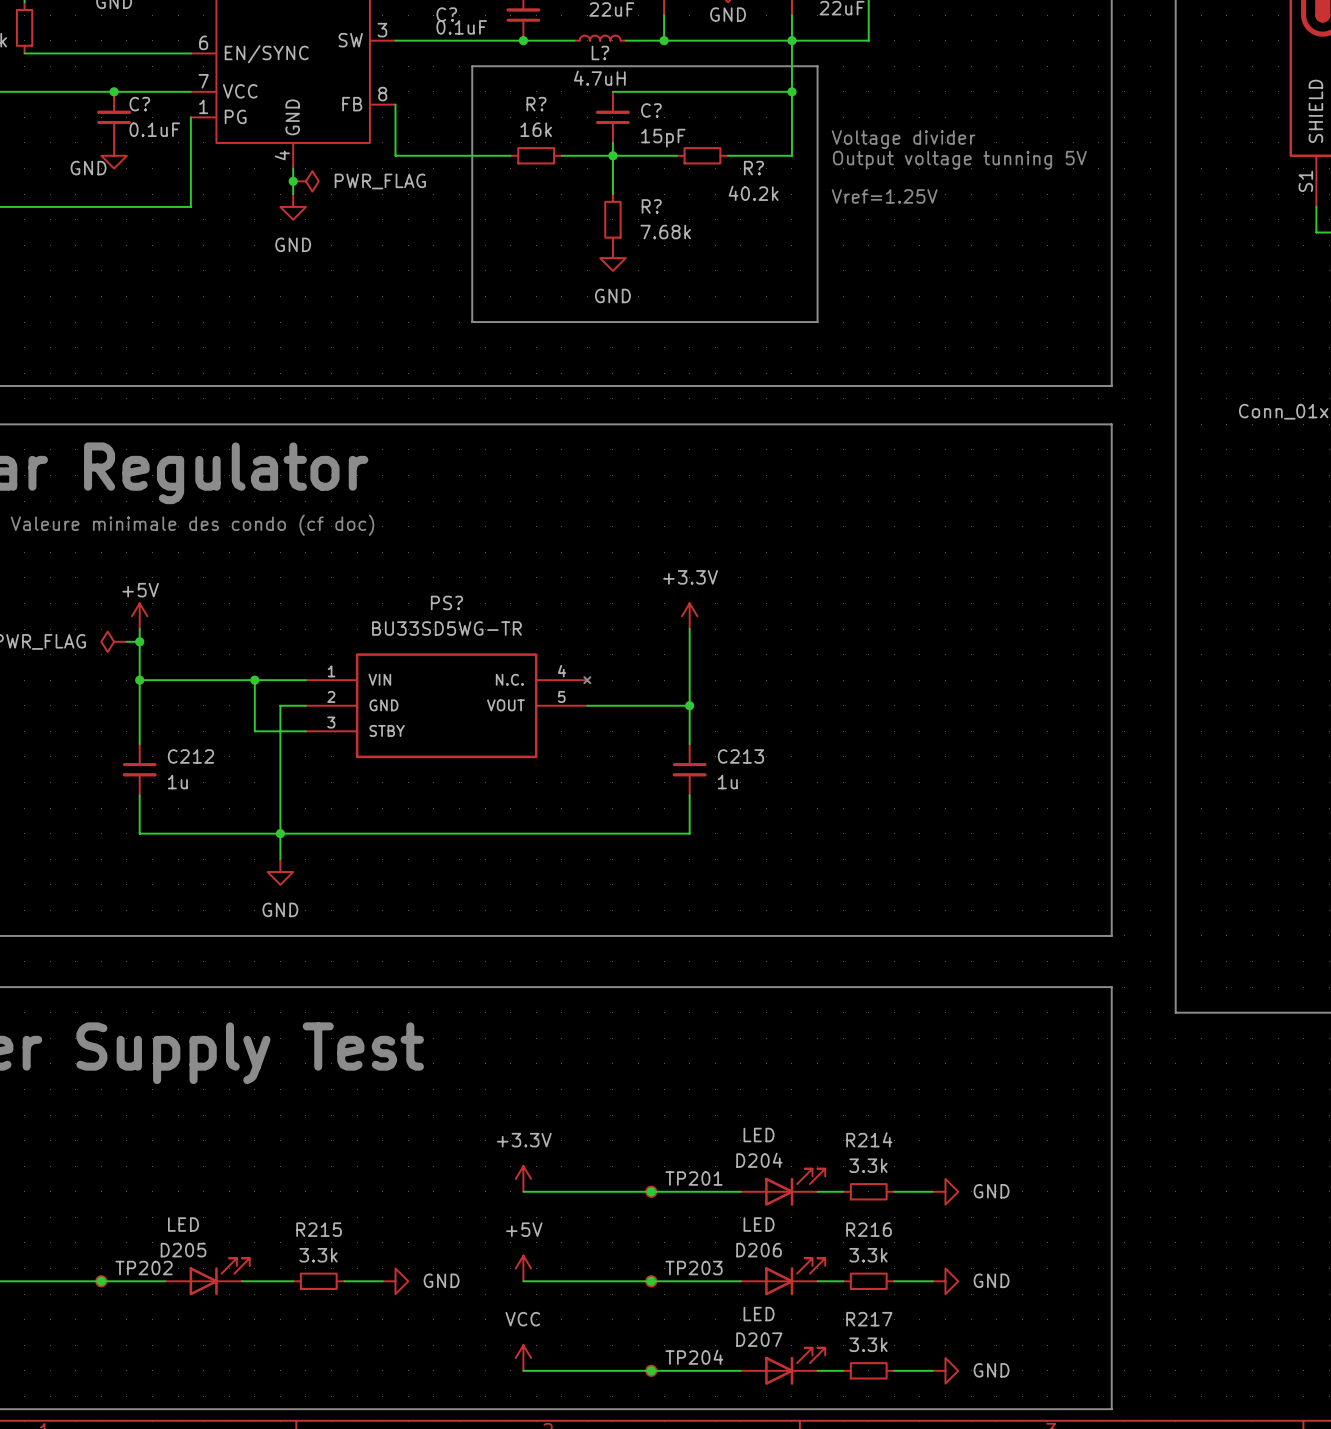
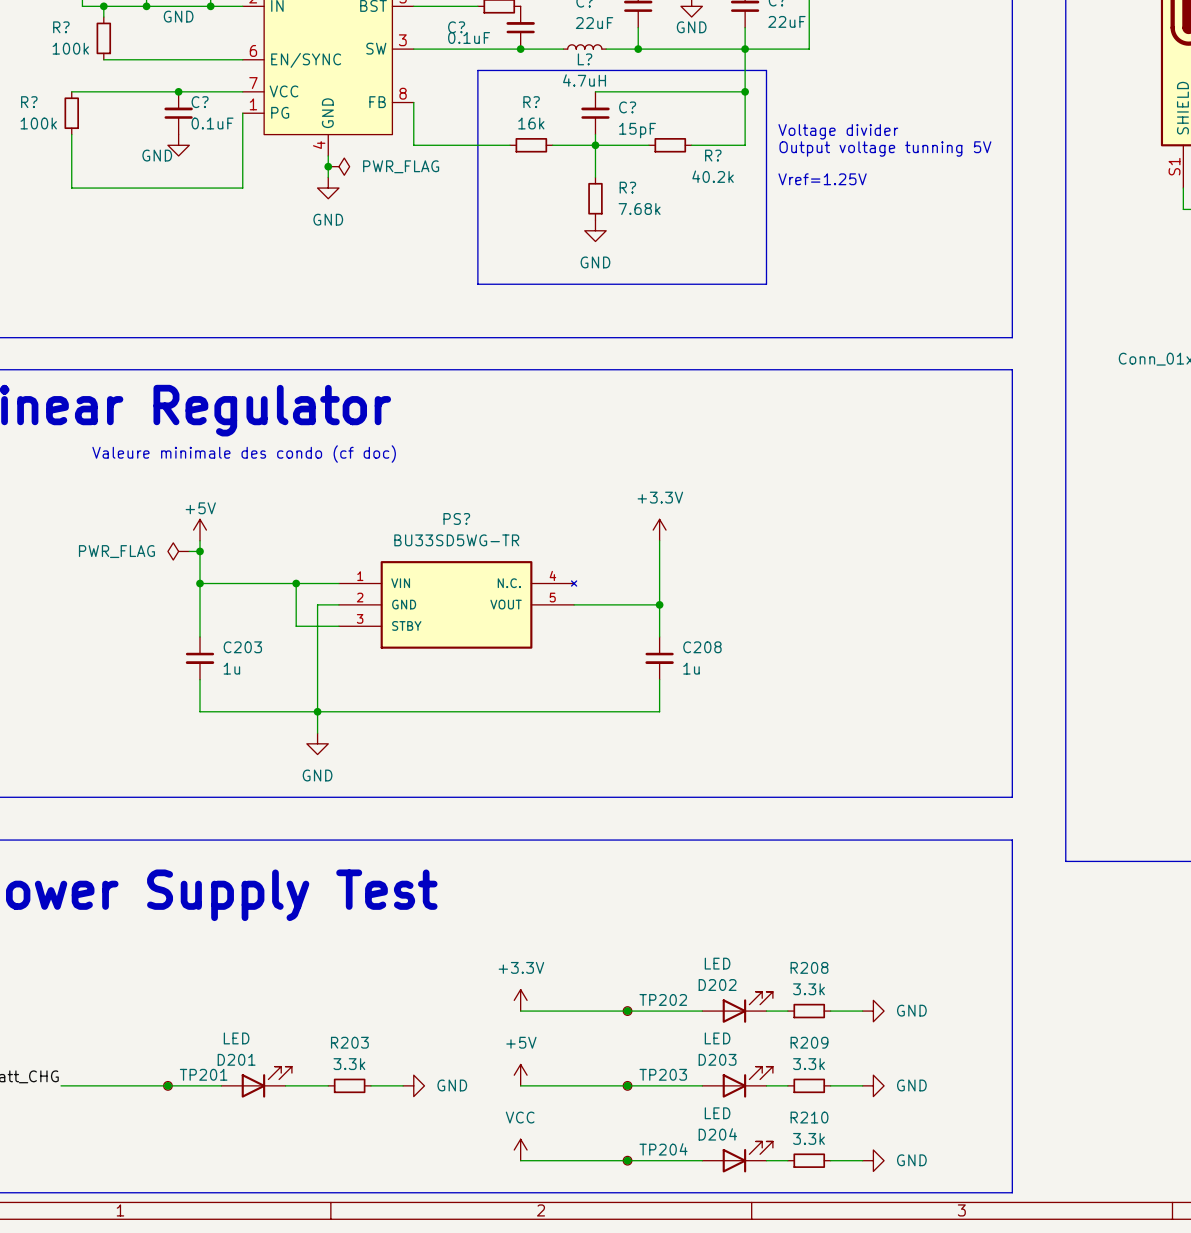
C212 name: C212 (190, 756) -> C203 (242, 647)
C213 name: C213 (740, 756) -> C208 (702, 647)
R214 name: R214 (869, 1139) -> R208 (809, 967)
D204 name: D204 (759, 1160) -> D202 (717, 985)
TP201 name: TP201 (694, 1178) -> TP202 (663, 999)
R215 name: R215 (319, 1229) -> R203 (349, 1042)
R216 name: R216 (869, 1229) -> R209 (809, 1042)
D205 name: D205 (183, 1250) -> D201 (236, 1059)
D206 name: D206 (759, 1250) -> D203 (717, 1059)
TP202 name: TP202 (144, 1268) -> TP201 (203, 1074)
R217 name: R217 (869, 1319) -> R210 (809, 1117)
D207 name: D207 (759, 1339) -> D204 (717, 1134)

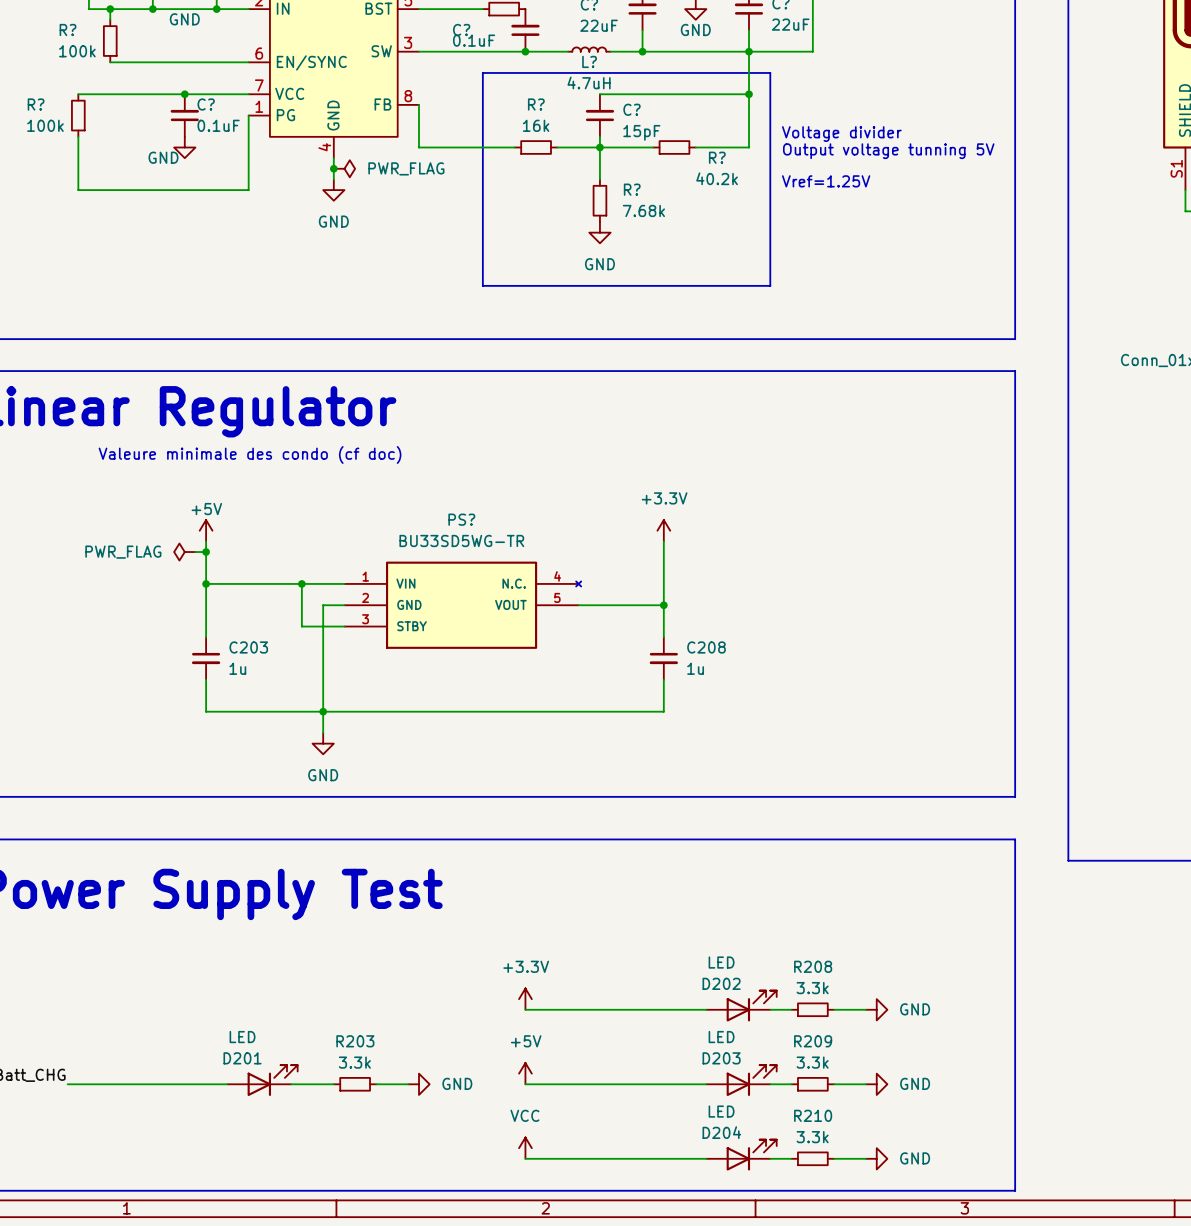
junction: (627, 1011) -> none
TP202: (627, 1011) -> none
junction: (167, 1085) -> none
TP201: (167, 1085) -> none
junction: (627, 1085) -> none
TP203: (627, 1085) -> none
junction: (627, 1160) -> none
TP204: (627, 1160) -> none

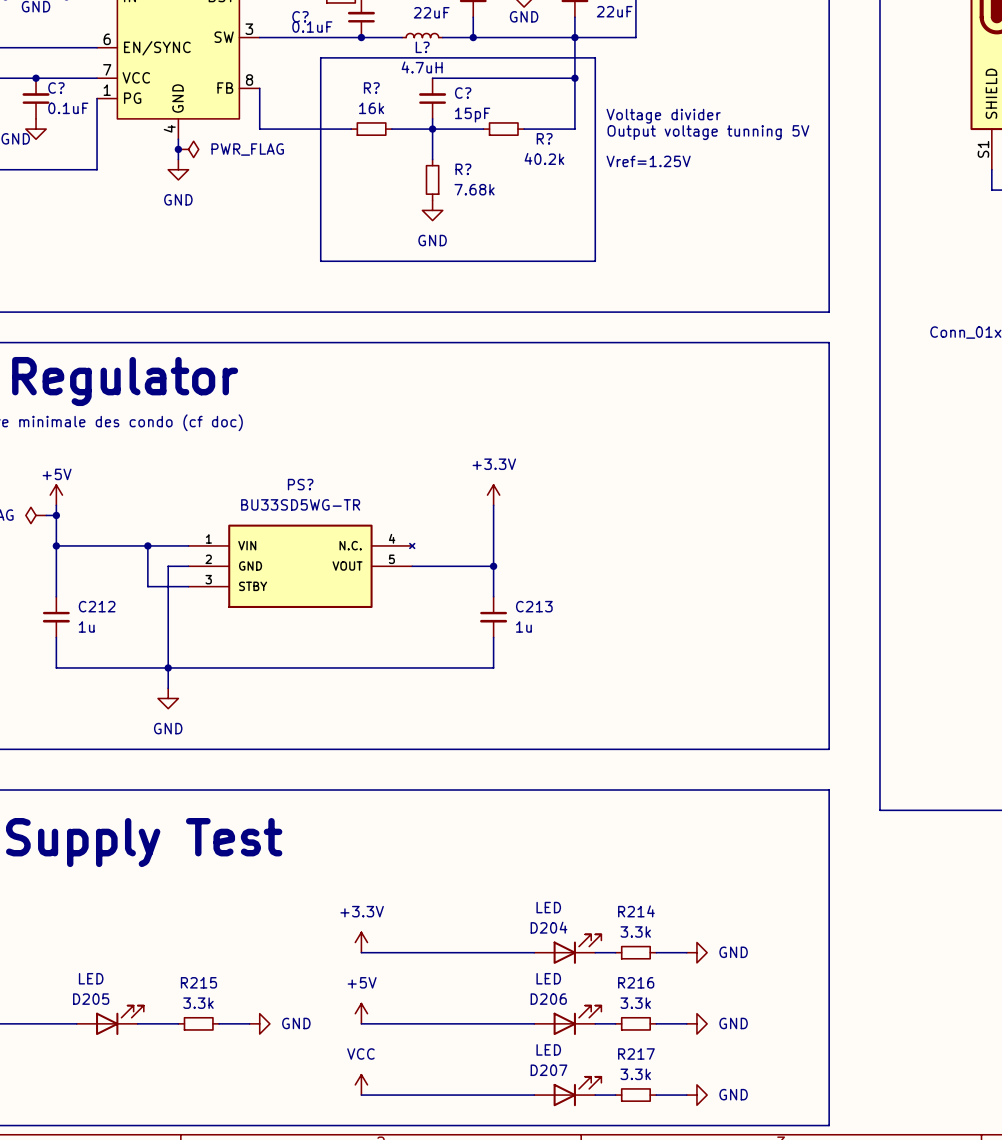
C203 name: C203 (248, 647) -> C212 (97, 606)
C208 name: C208 (706, 647) -> C213 (534, 606)
R208 name: R208 (813, 966) -> R214 (636, 911)
D202 name: D202 (721, 983) -> D204 (548, 927)
R203 name: R203 (355, 1041) -> R215 (198, 982)
R209 name: R209 (813, 1041) -> R216 (636, 982)
D201 name: D201 (242, 1058) -> D205 (91, 999)
D203 name: D203 (721, 1058) -> D206 (548, 999)
R210 name: R210 (813, 1115) -> R217 (636, 1053)
D204 name: D204 (721, 1132) -> D207 (548, 1070)

